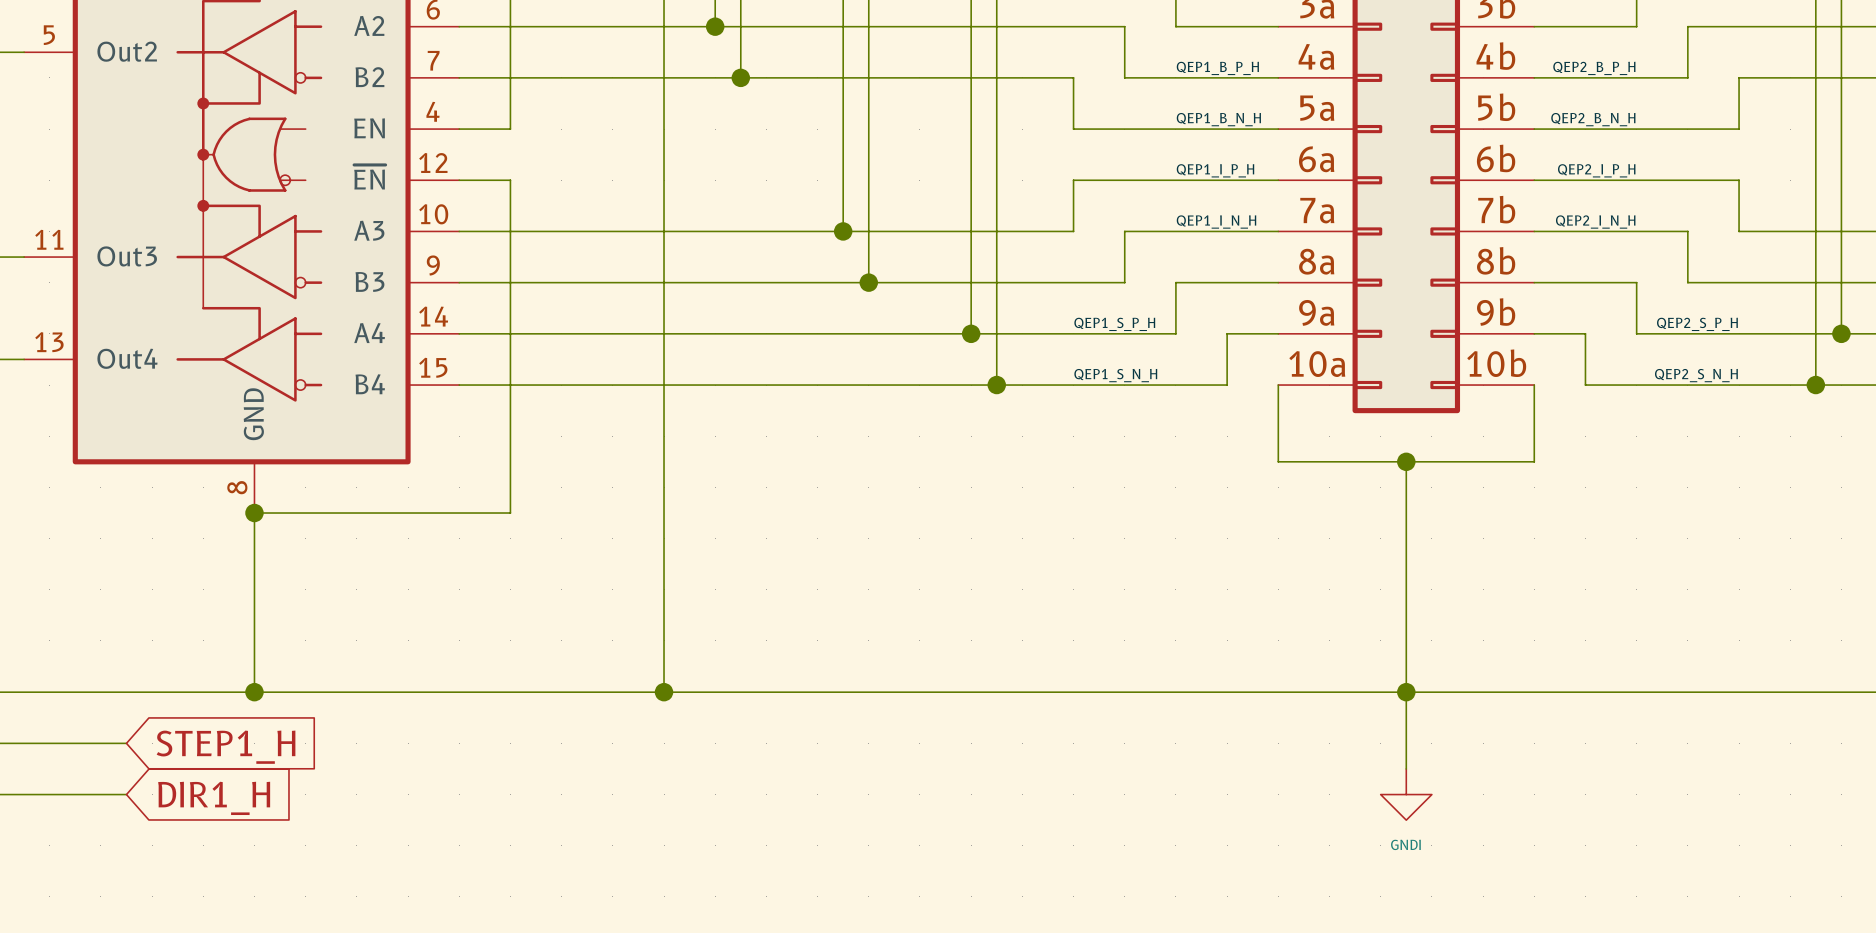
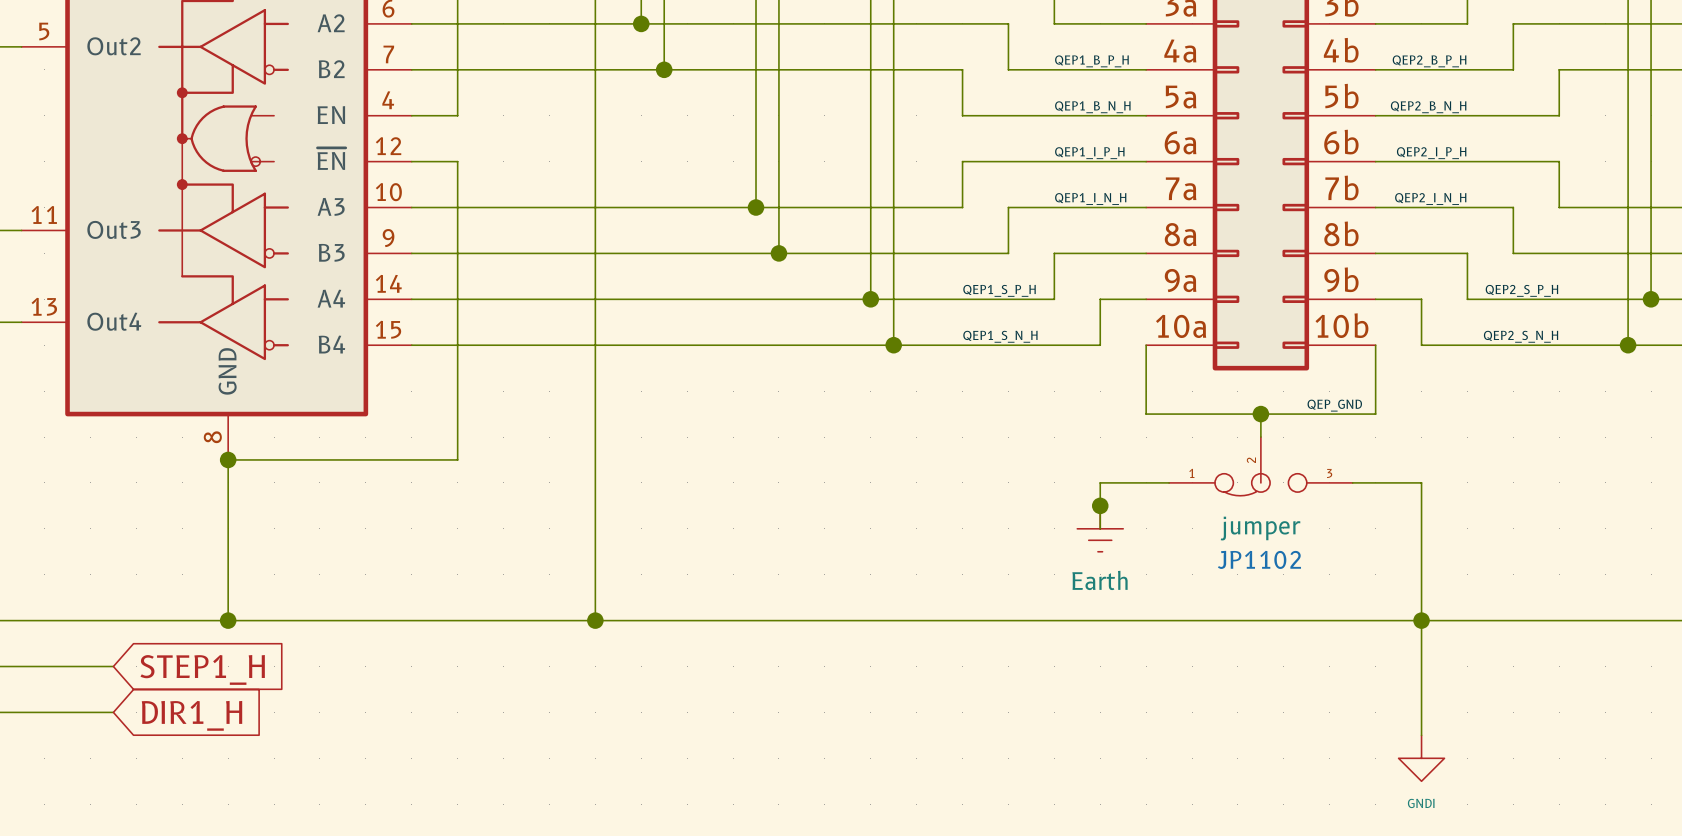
label: none -> QEP_GND (1334, 405)
wire: (1406, 487) (1406, 768) -> none
JP1102: none -> jumper (1260, 466)
wire: none -> (1169, 482) (1100, 482) (1100, 528)
wire: none -> (1352, 482) (1421, 482) (1421, 735)
junction: none -> (1100, 505)
power symbol: none -> Earth (1100, 528)
junction: (1406, 692) -> none
junction: none -> (1421, 620)
power symbol position: GNDI (1406, 794) -> GNDI (1421, 758)

